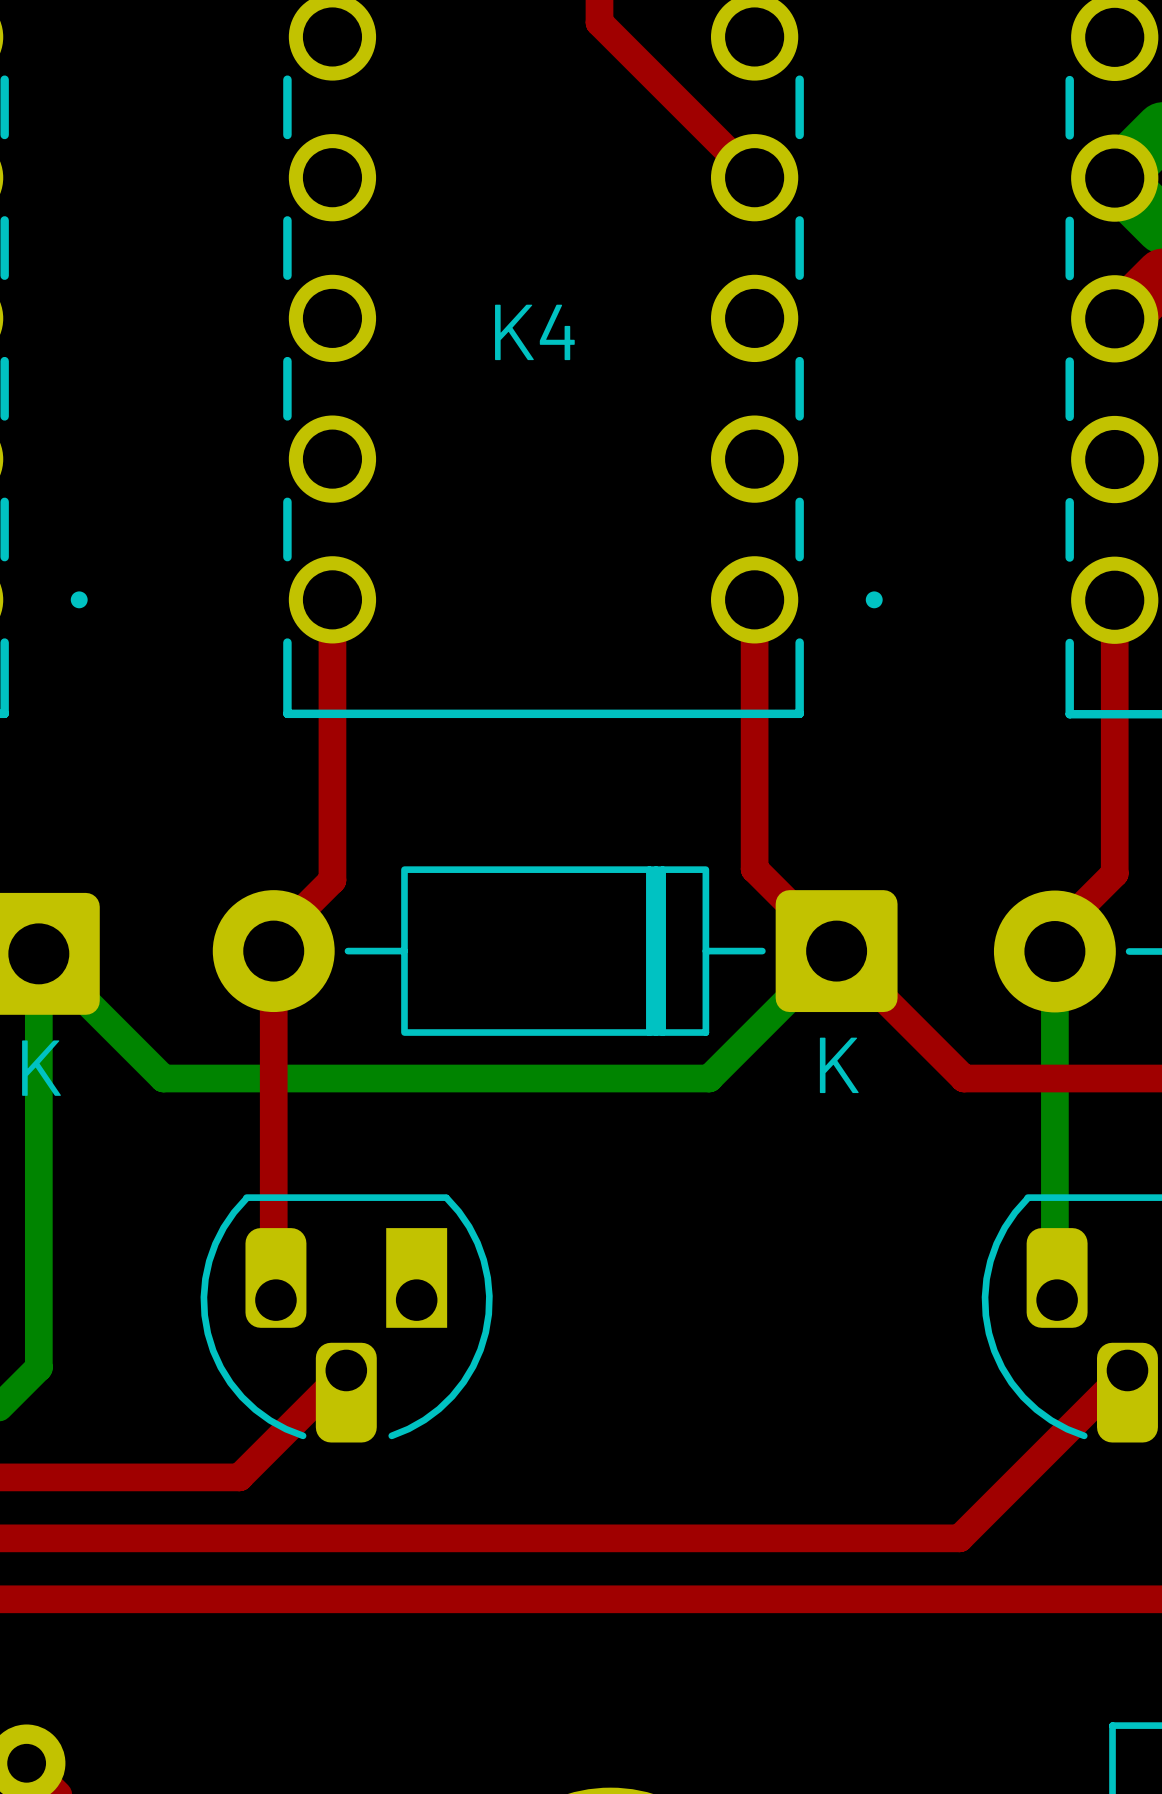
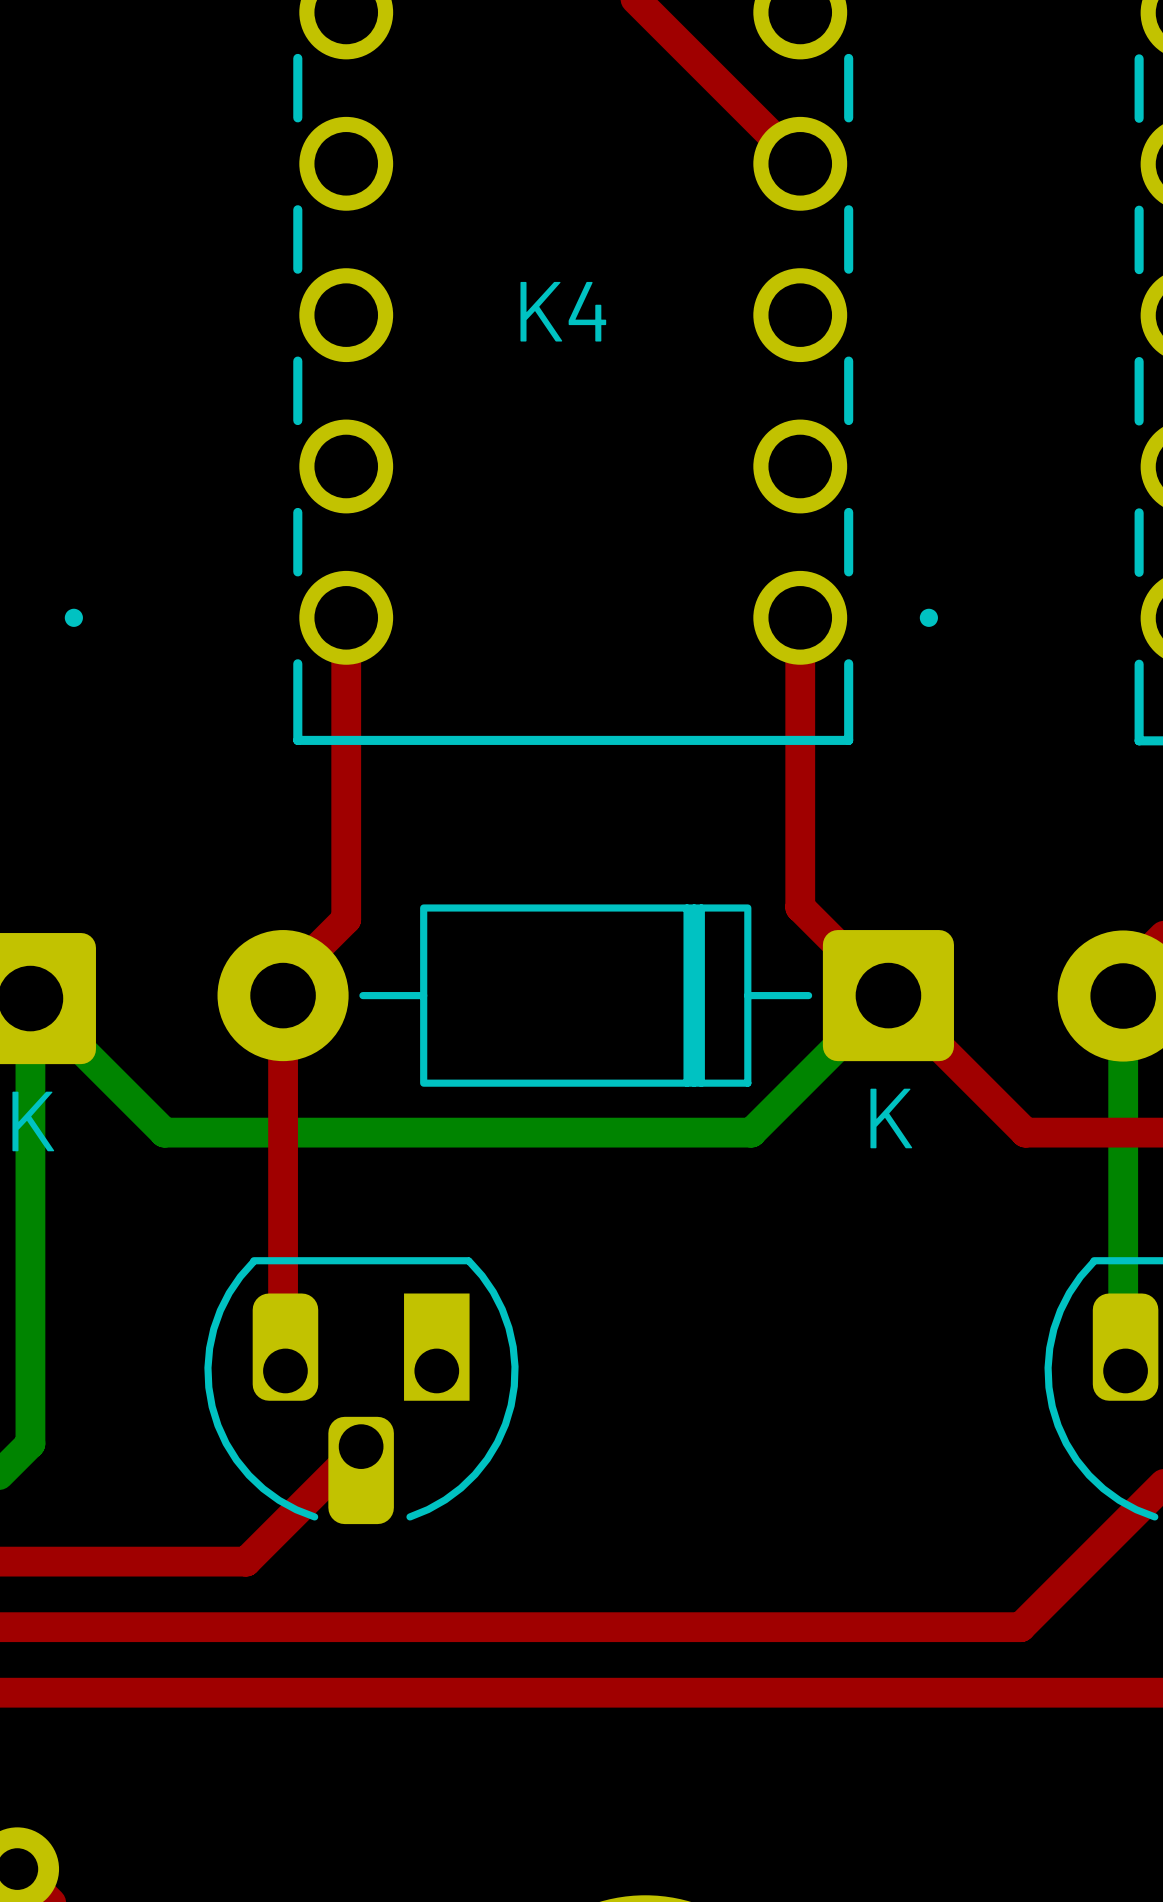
K4 name position: K4 (534, 332) -> K4 (563, 311)

